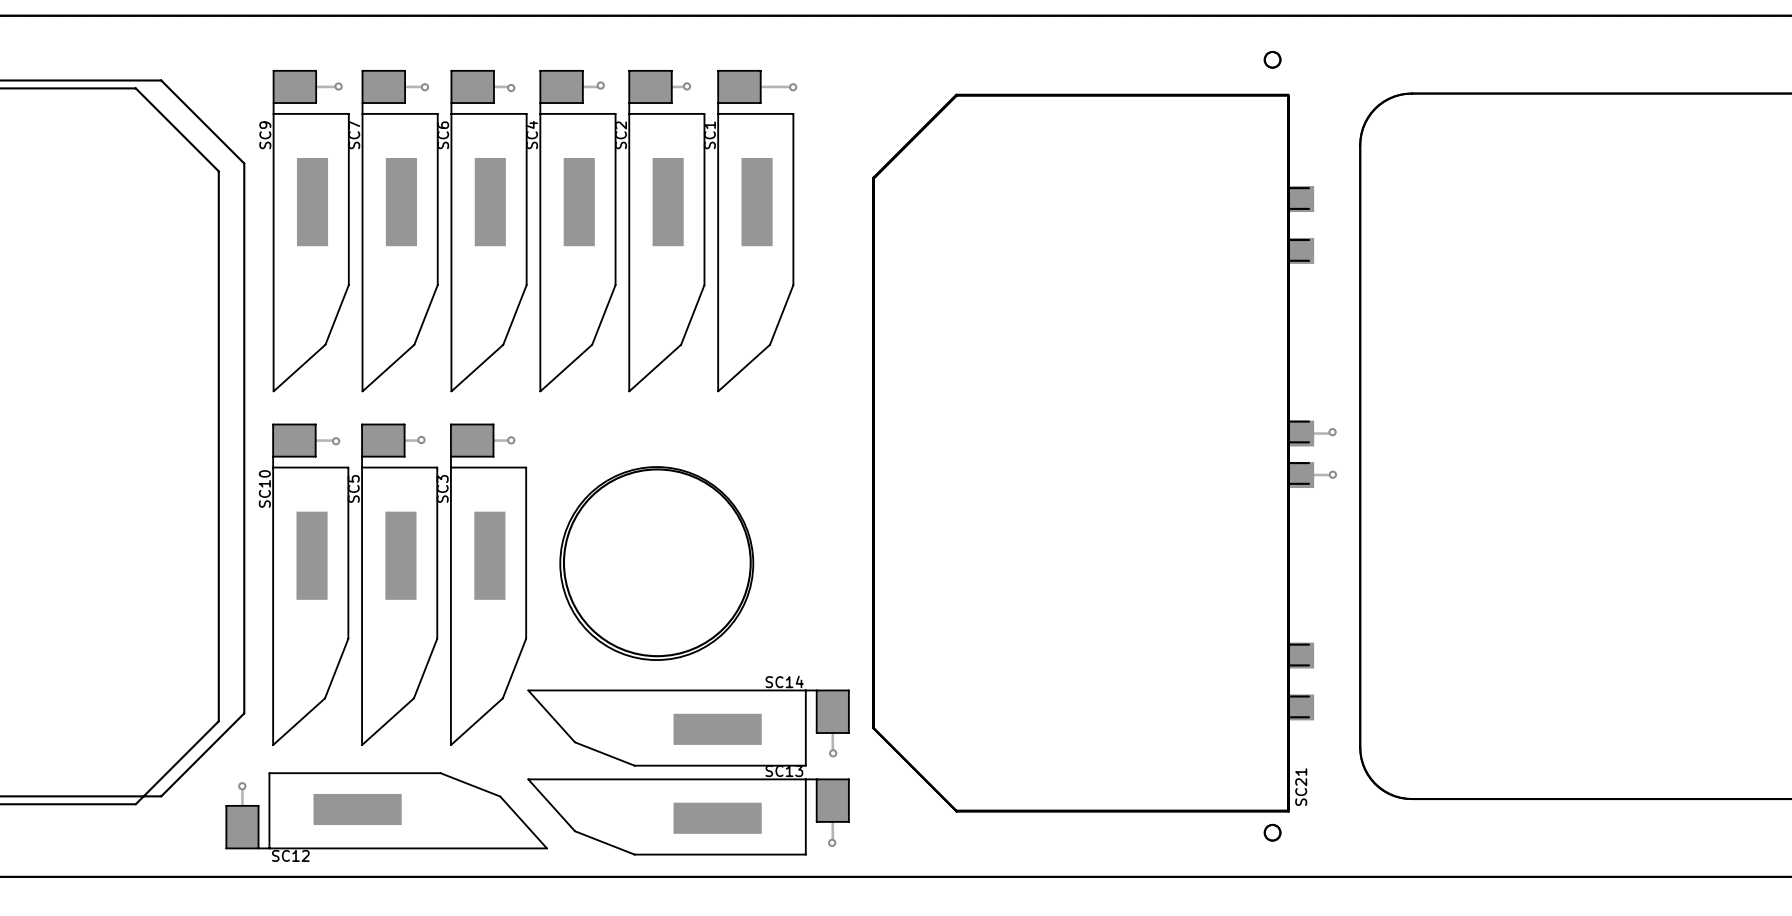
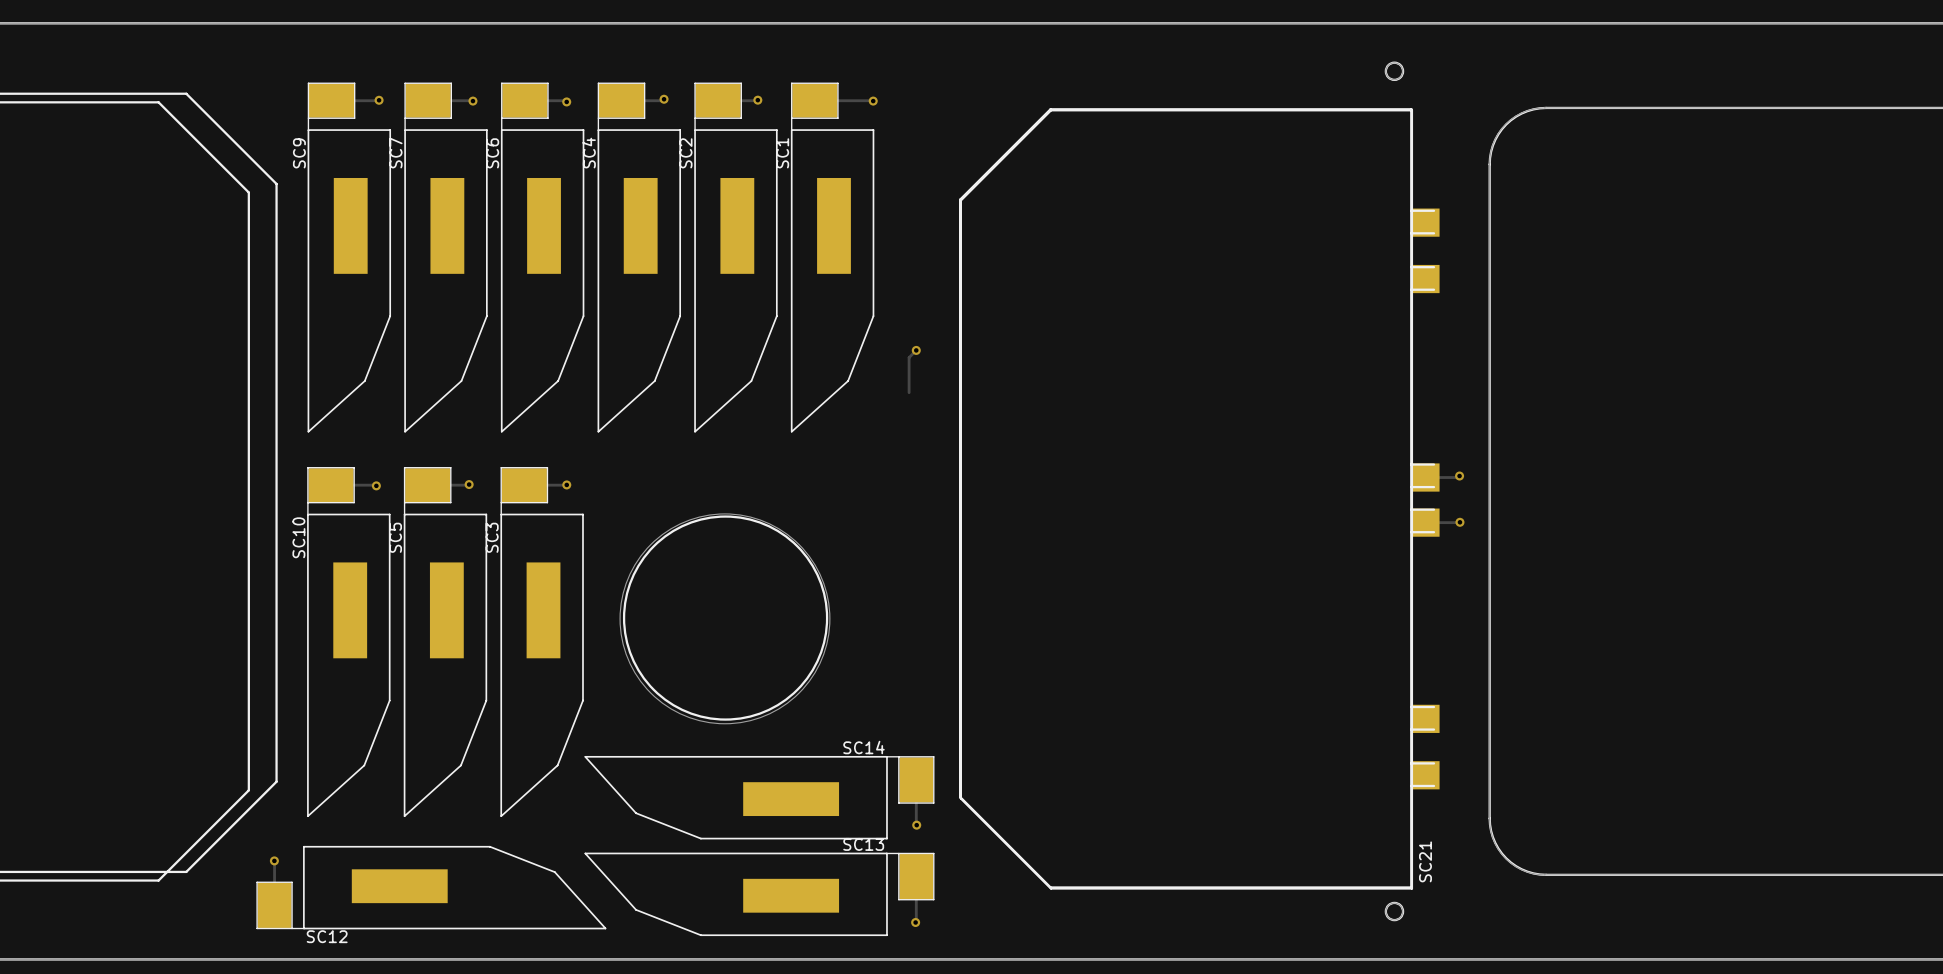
track: none -> (916, 350) (909, 357) (909, 392)
via: none -> (916, 350)

